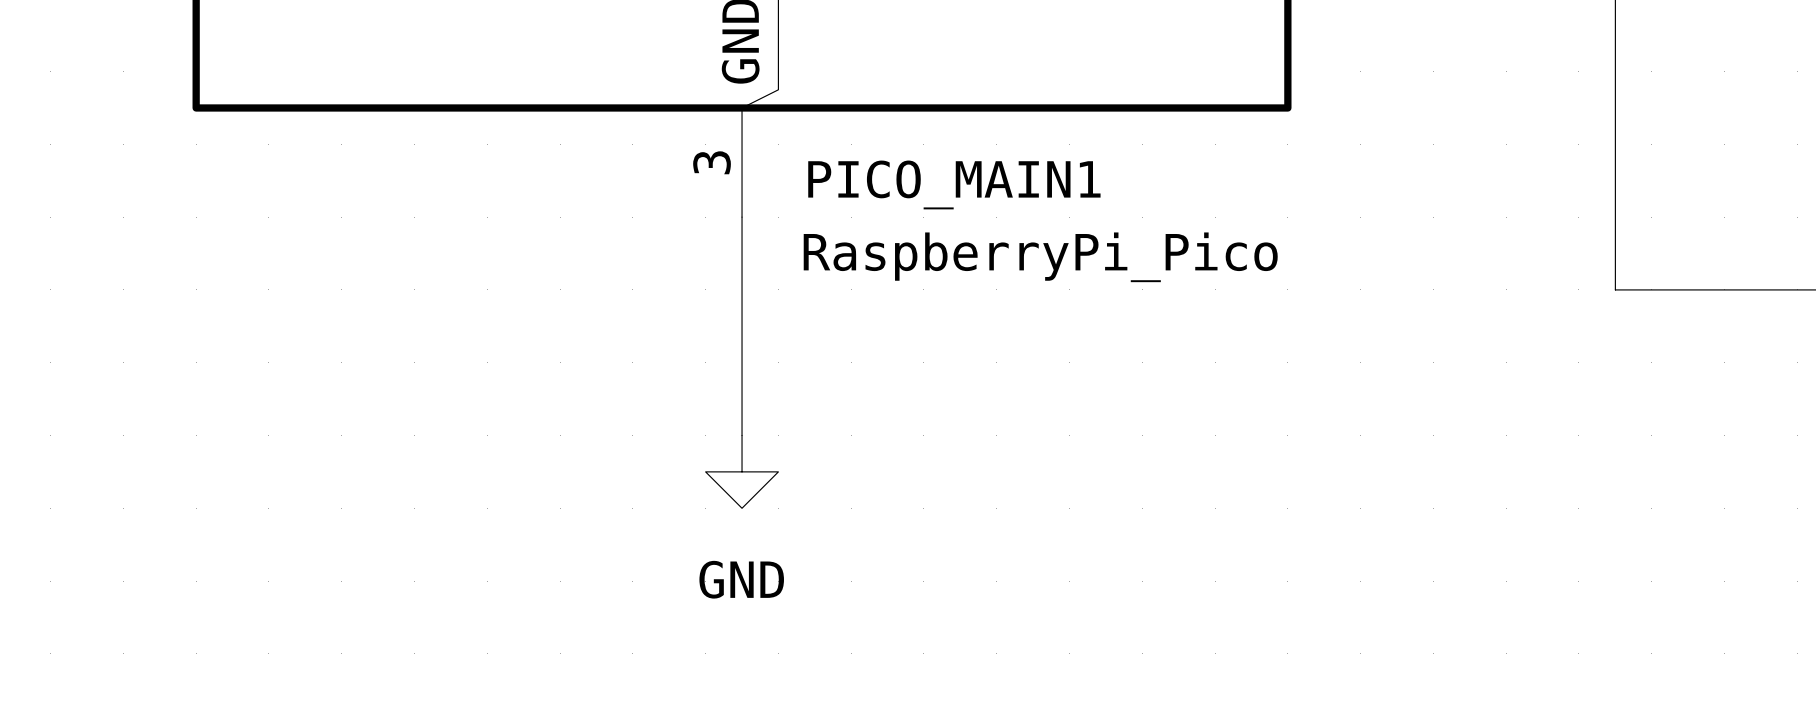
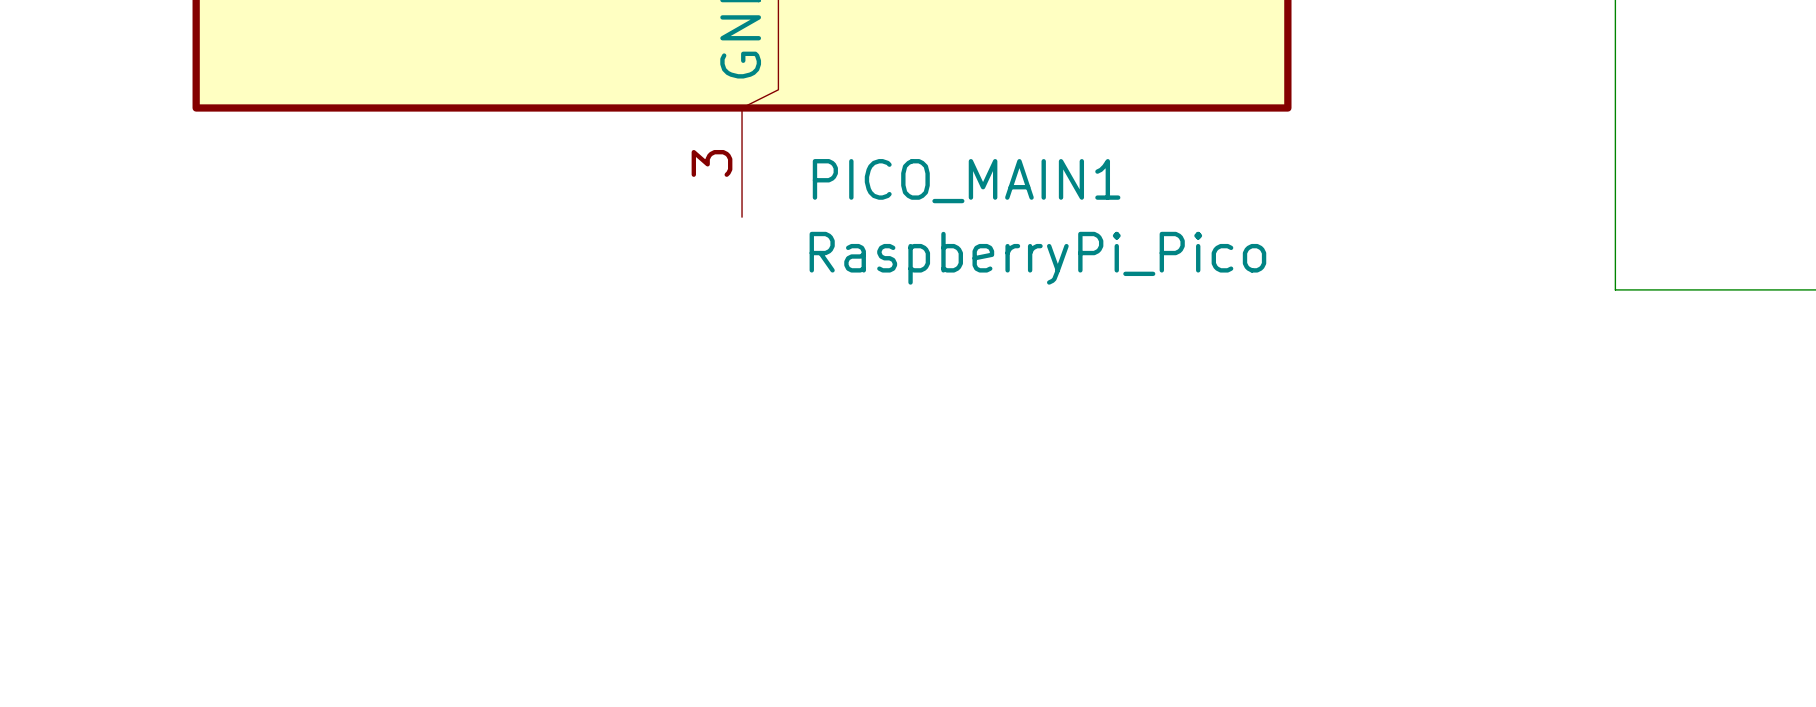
wire: (742, 217) (742, 435) -> none
power symbol: GND (742, 471) -> none

